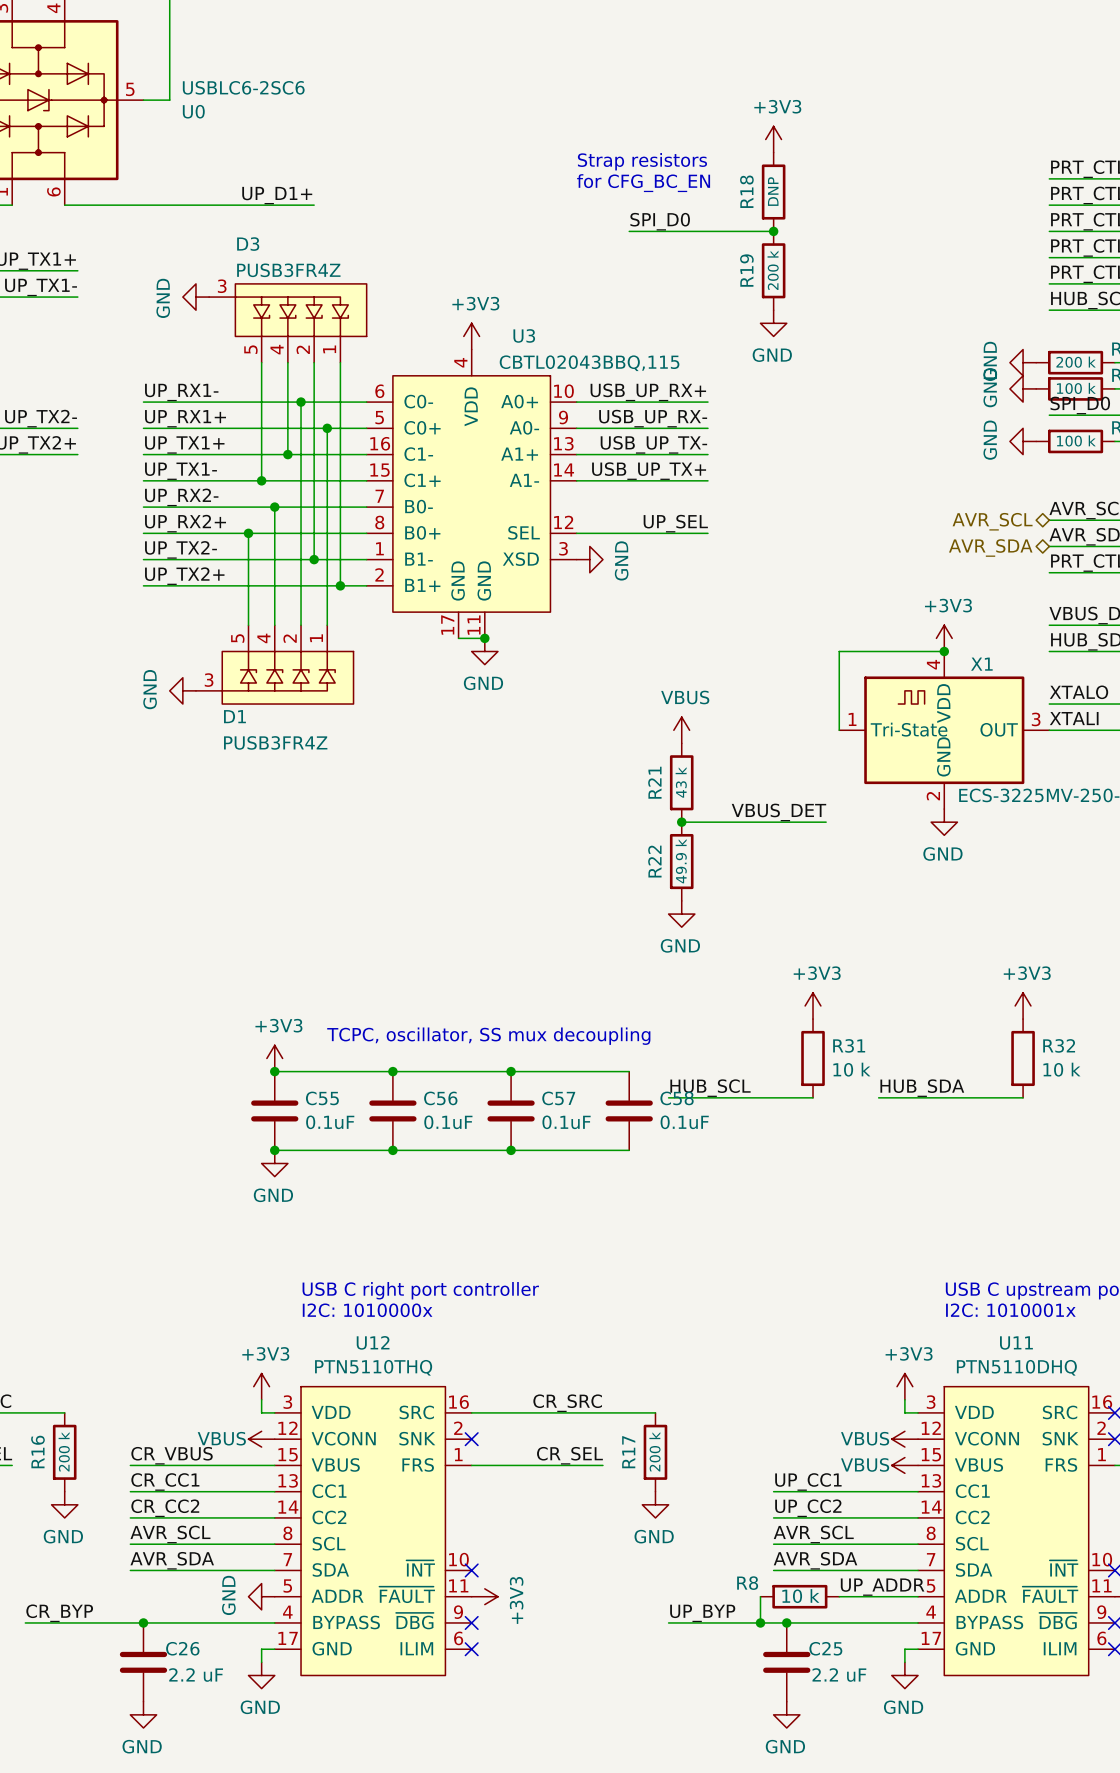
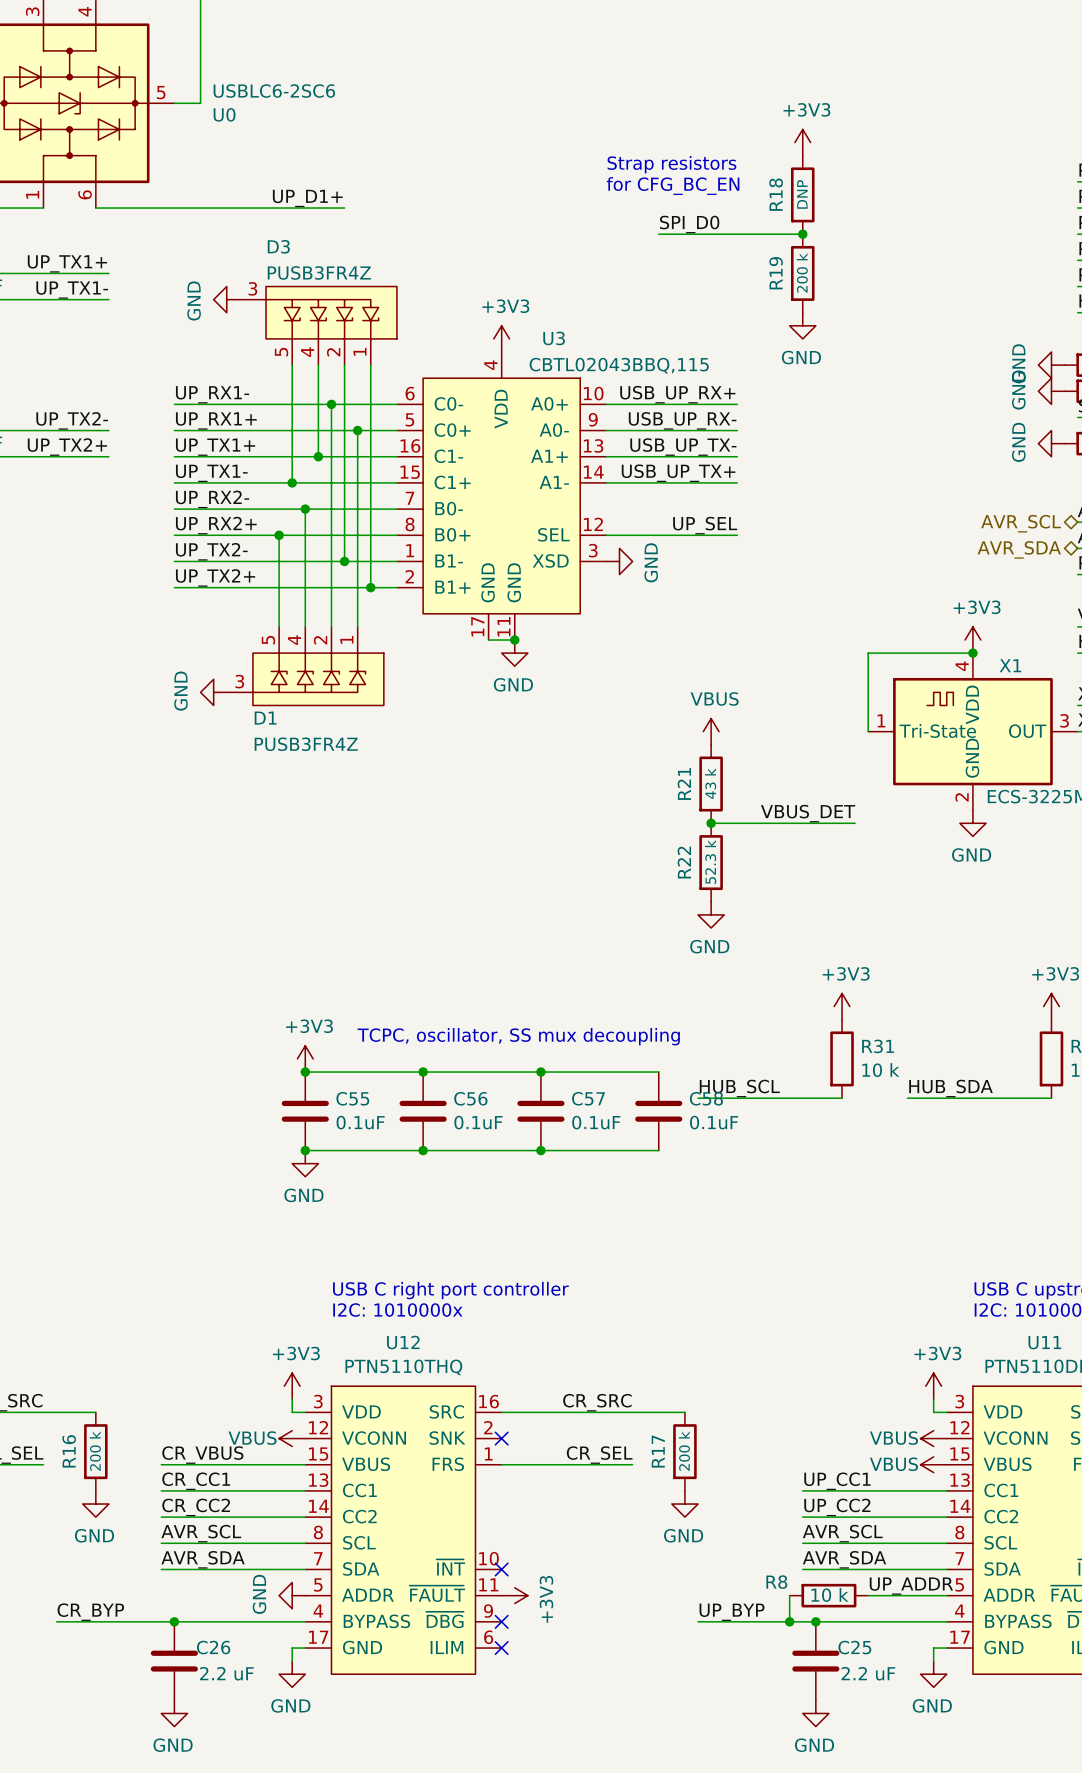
R22 value: 49.9 k (681, 861) -> 52.3 k (710, 862)

